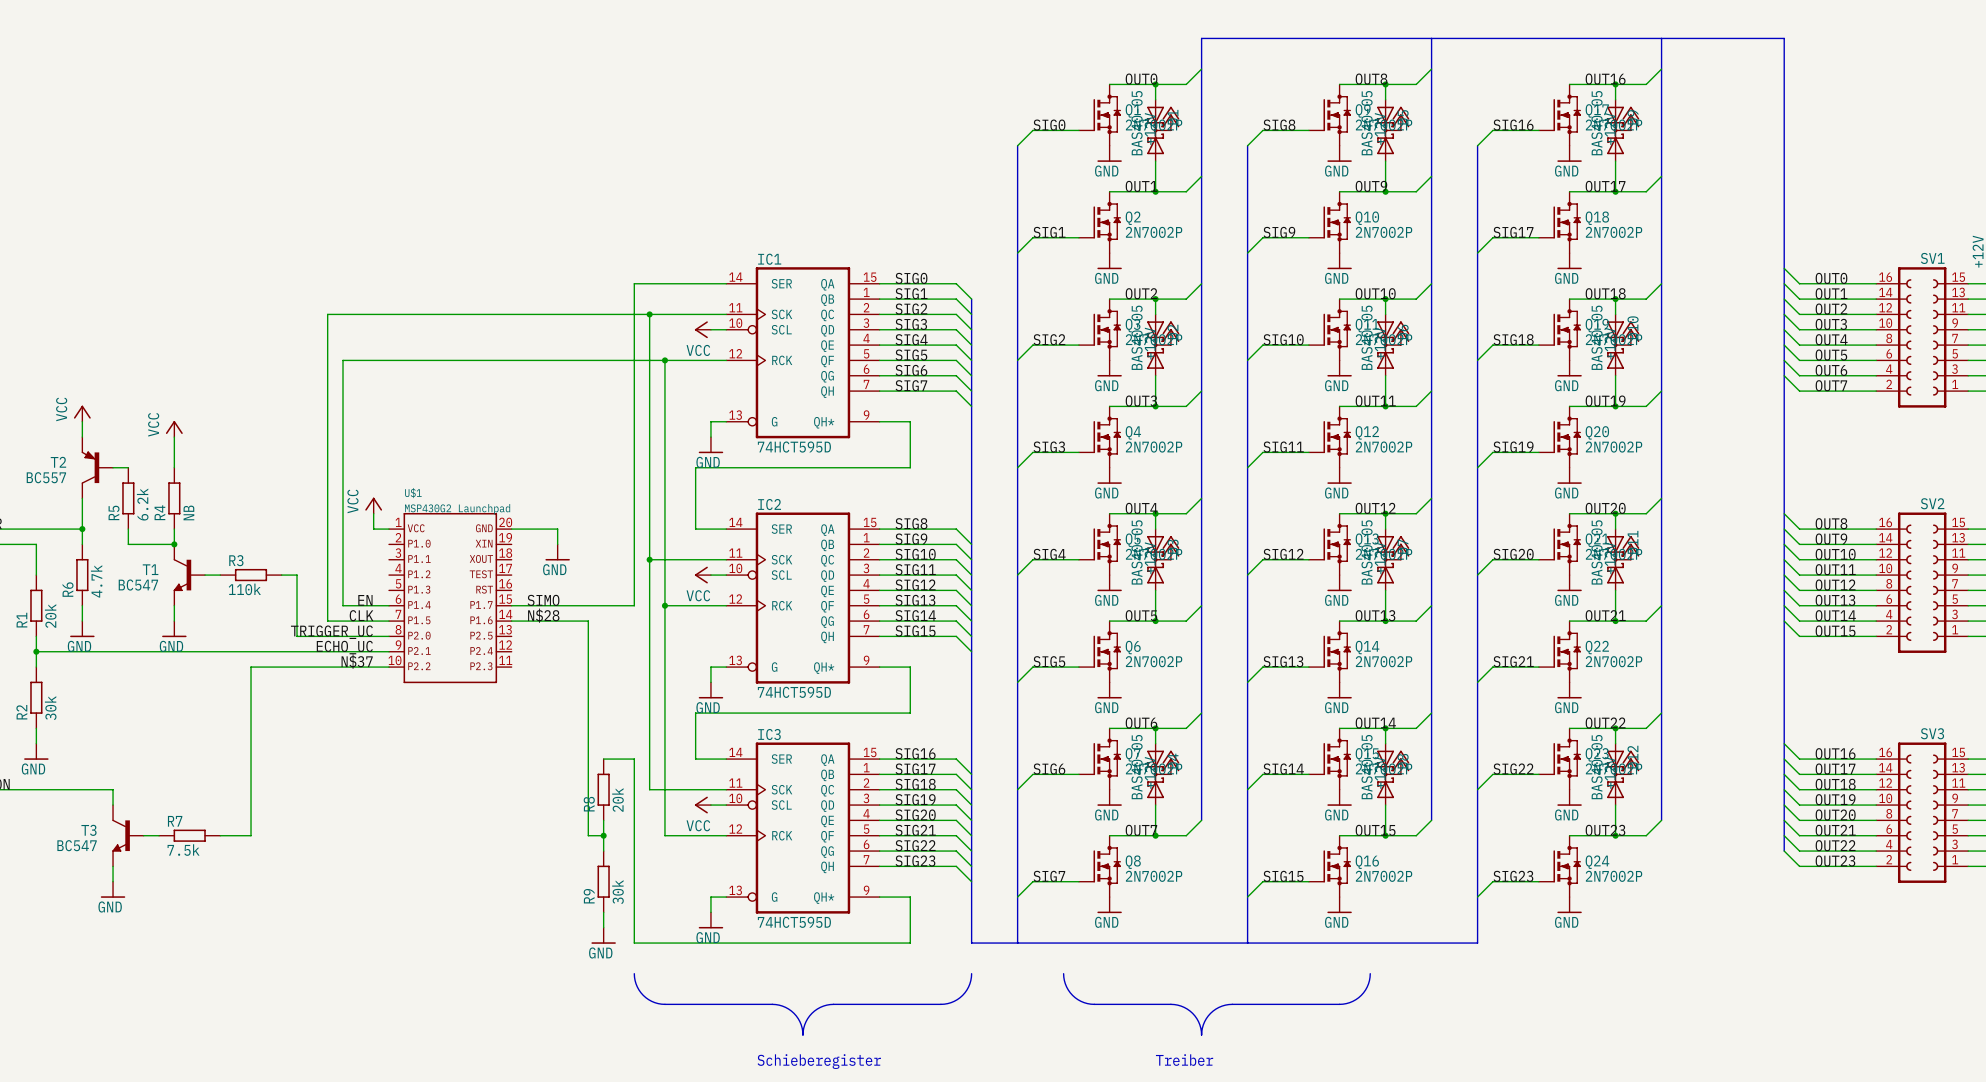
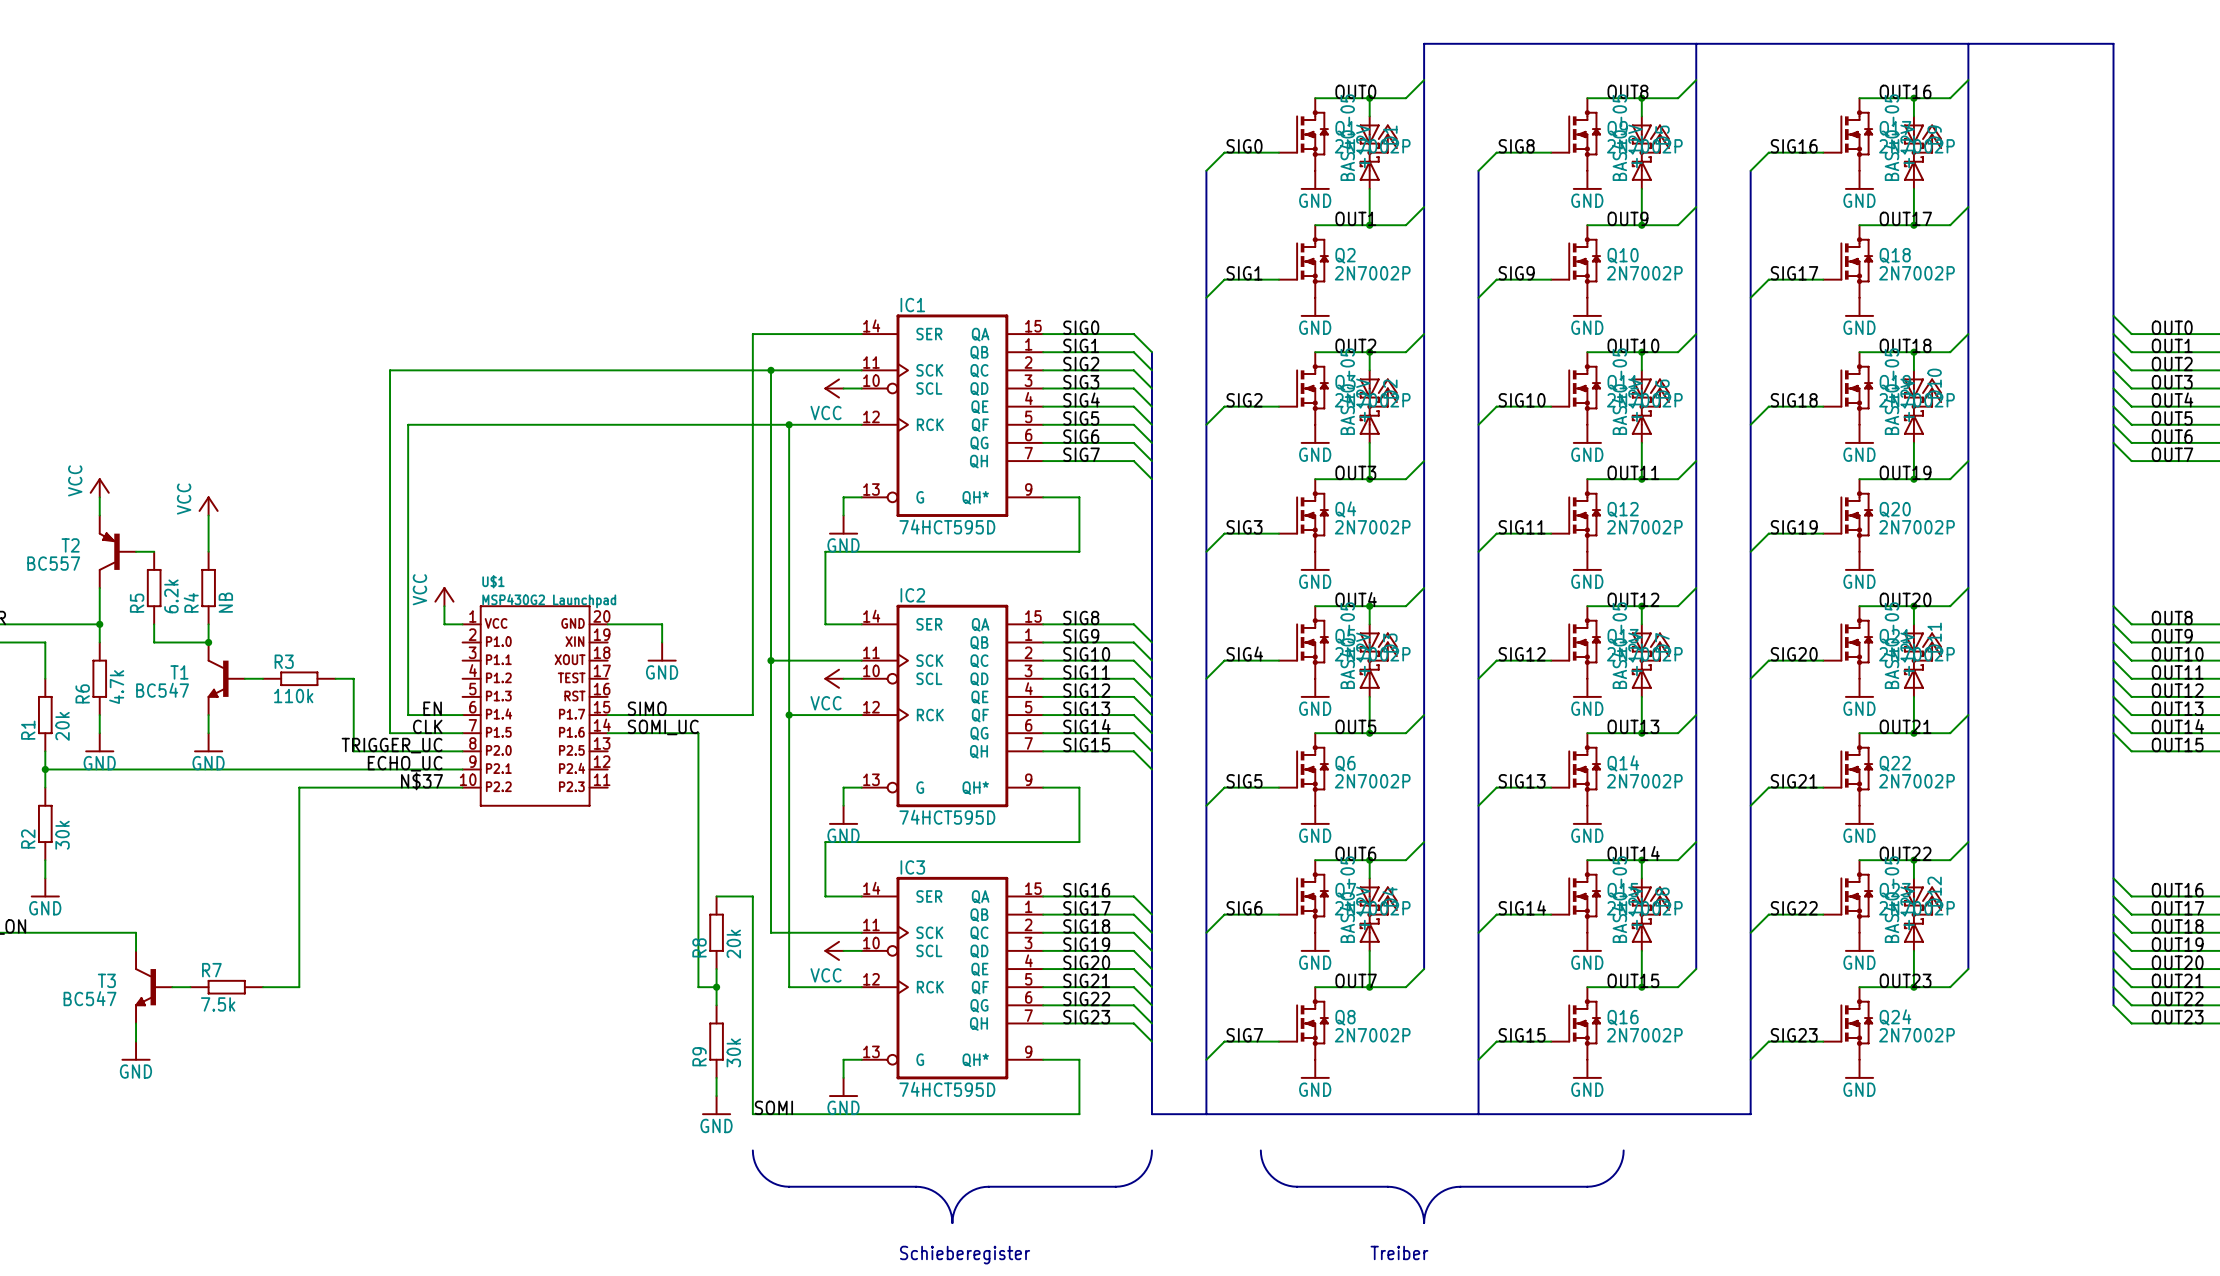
label: N$28 (543, 615) -> SOMI_UC (663, 727)
label: none -> SOMI (773, 1107)

